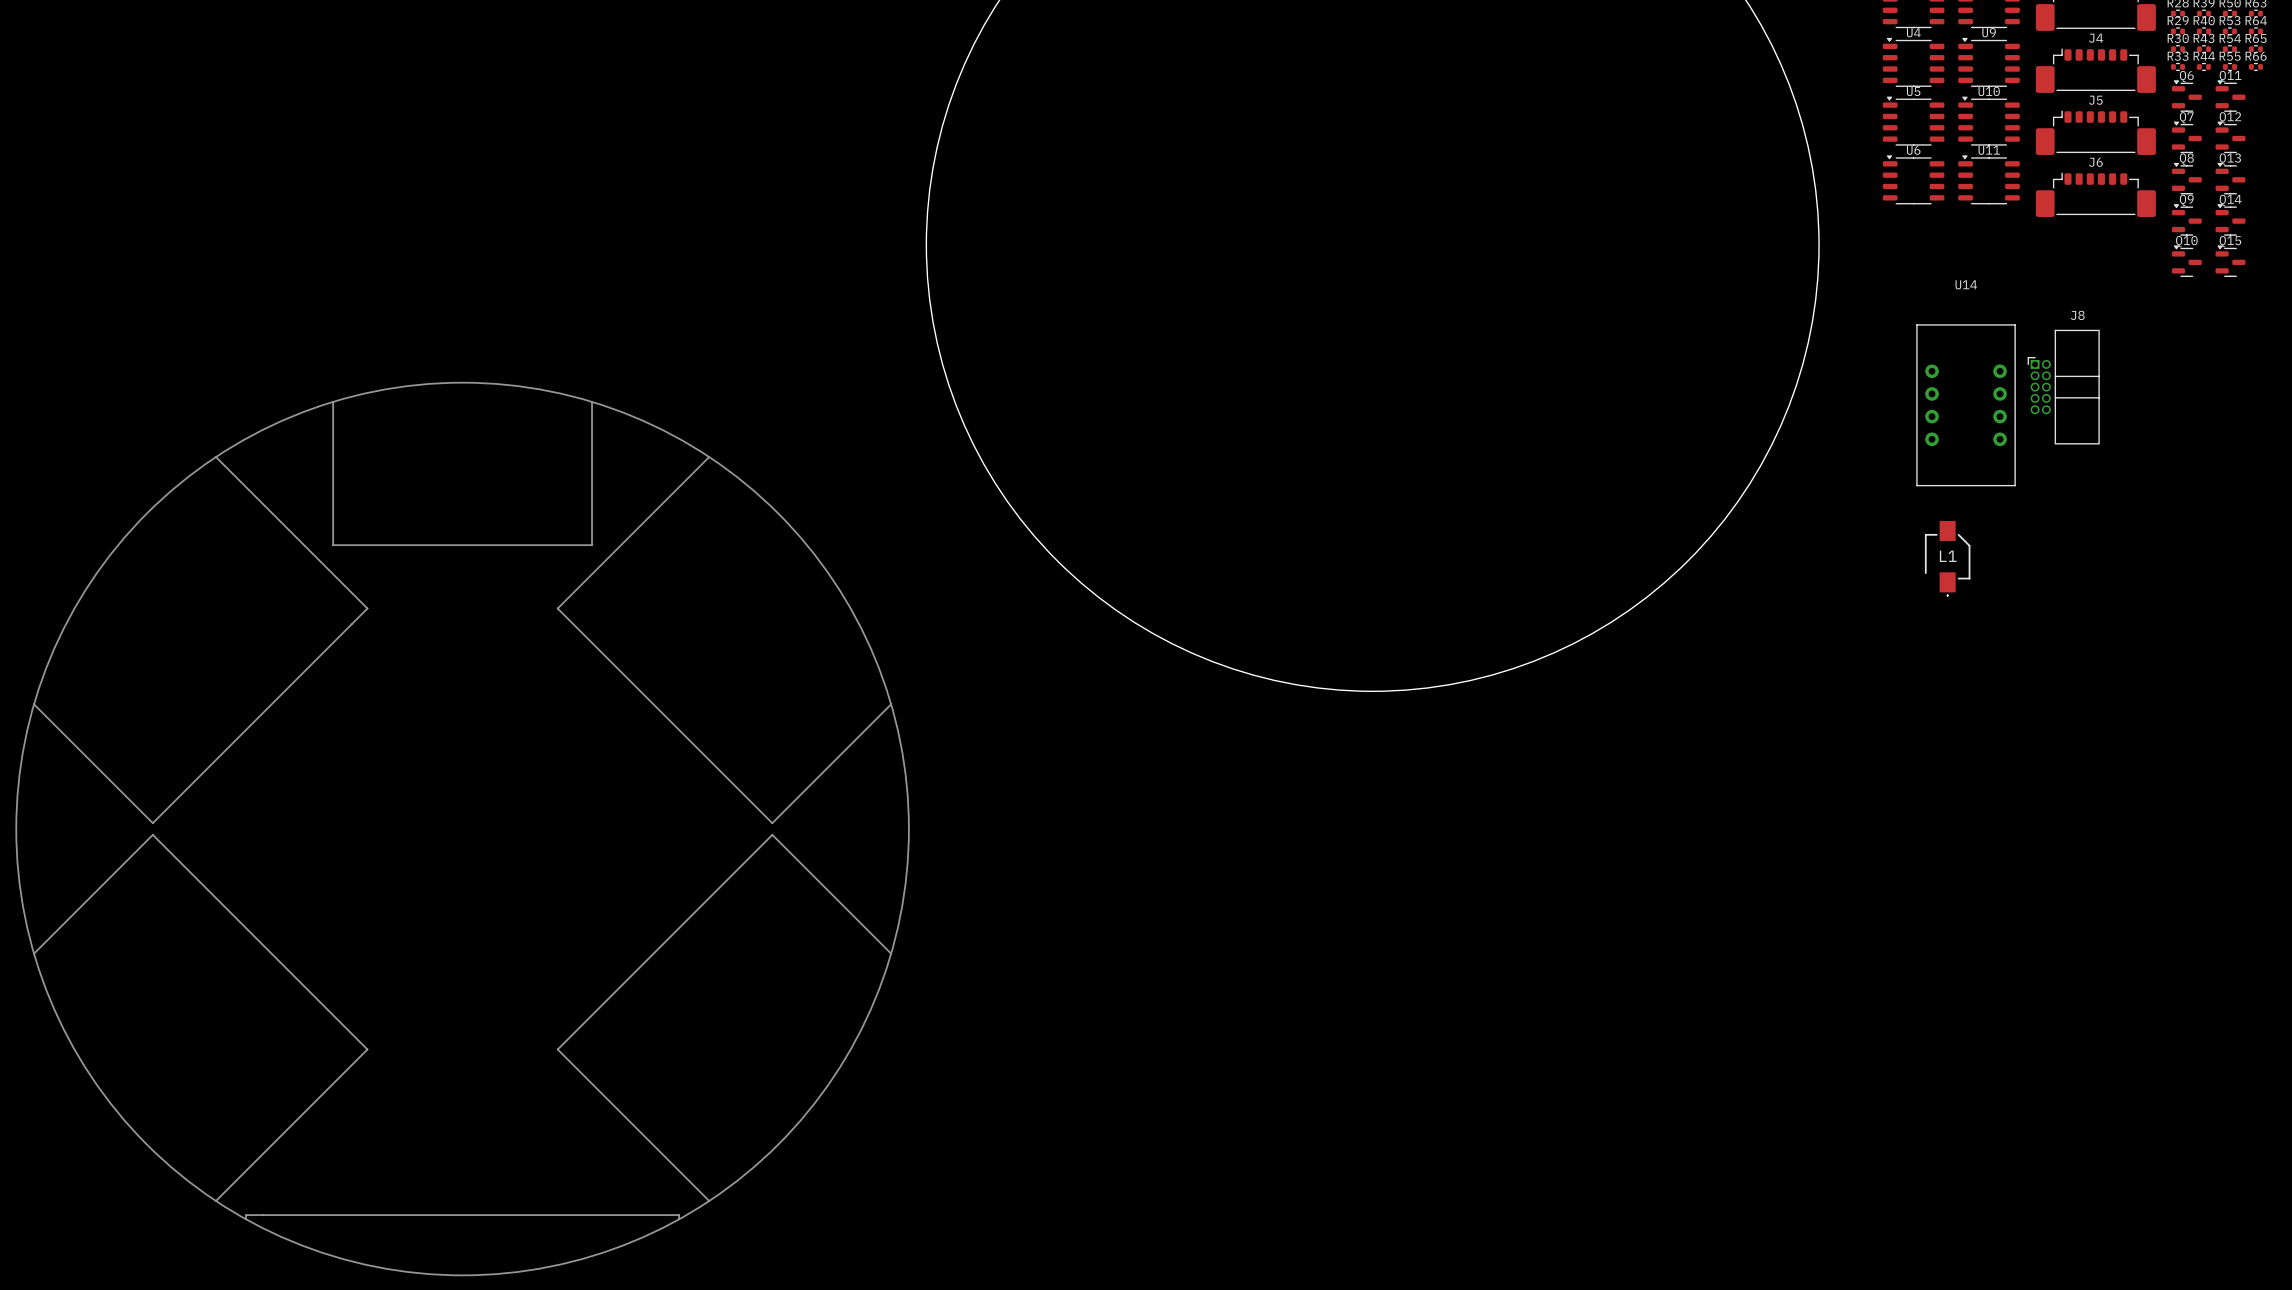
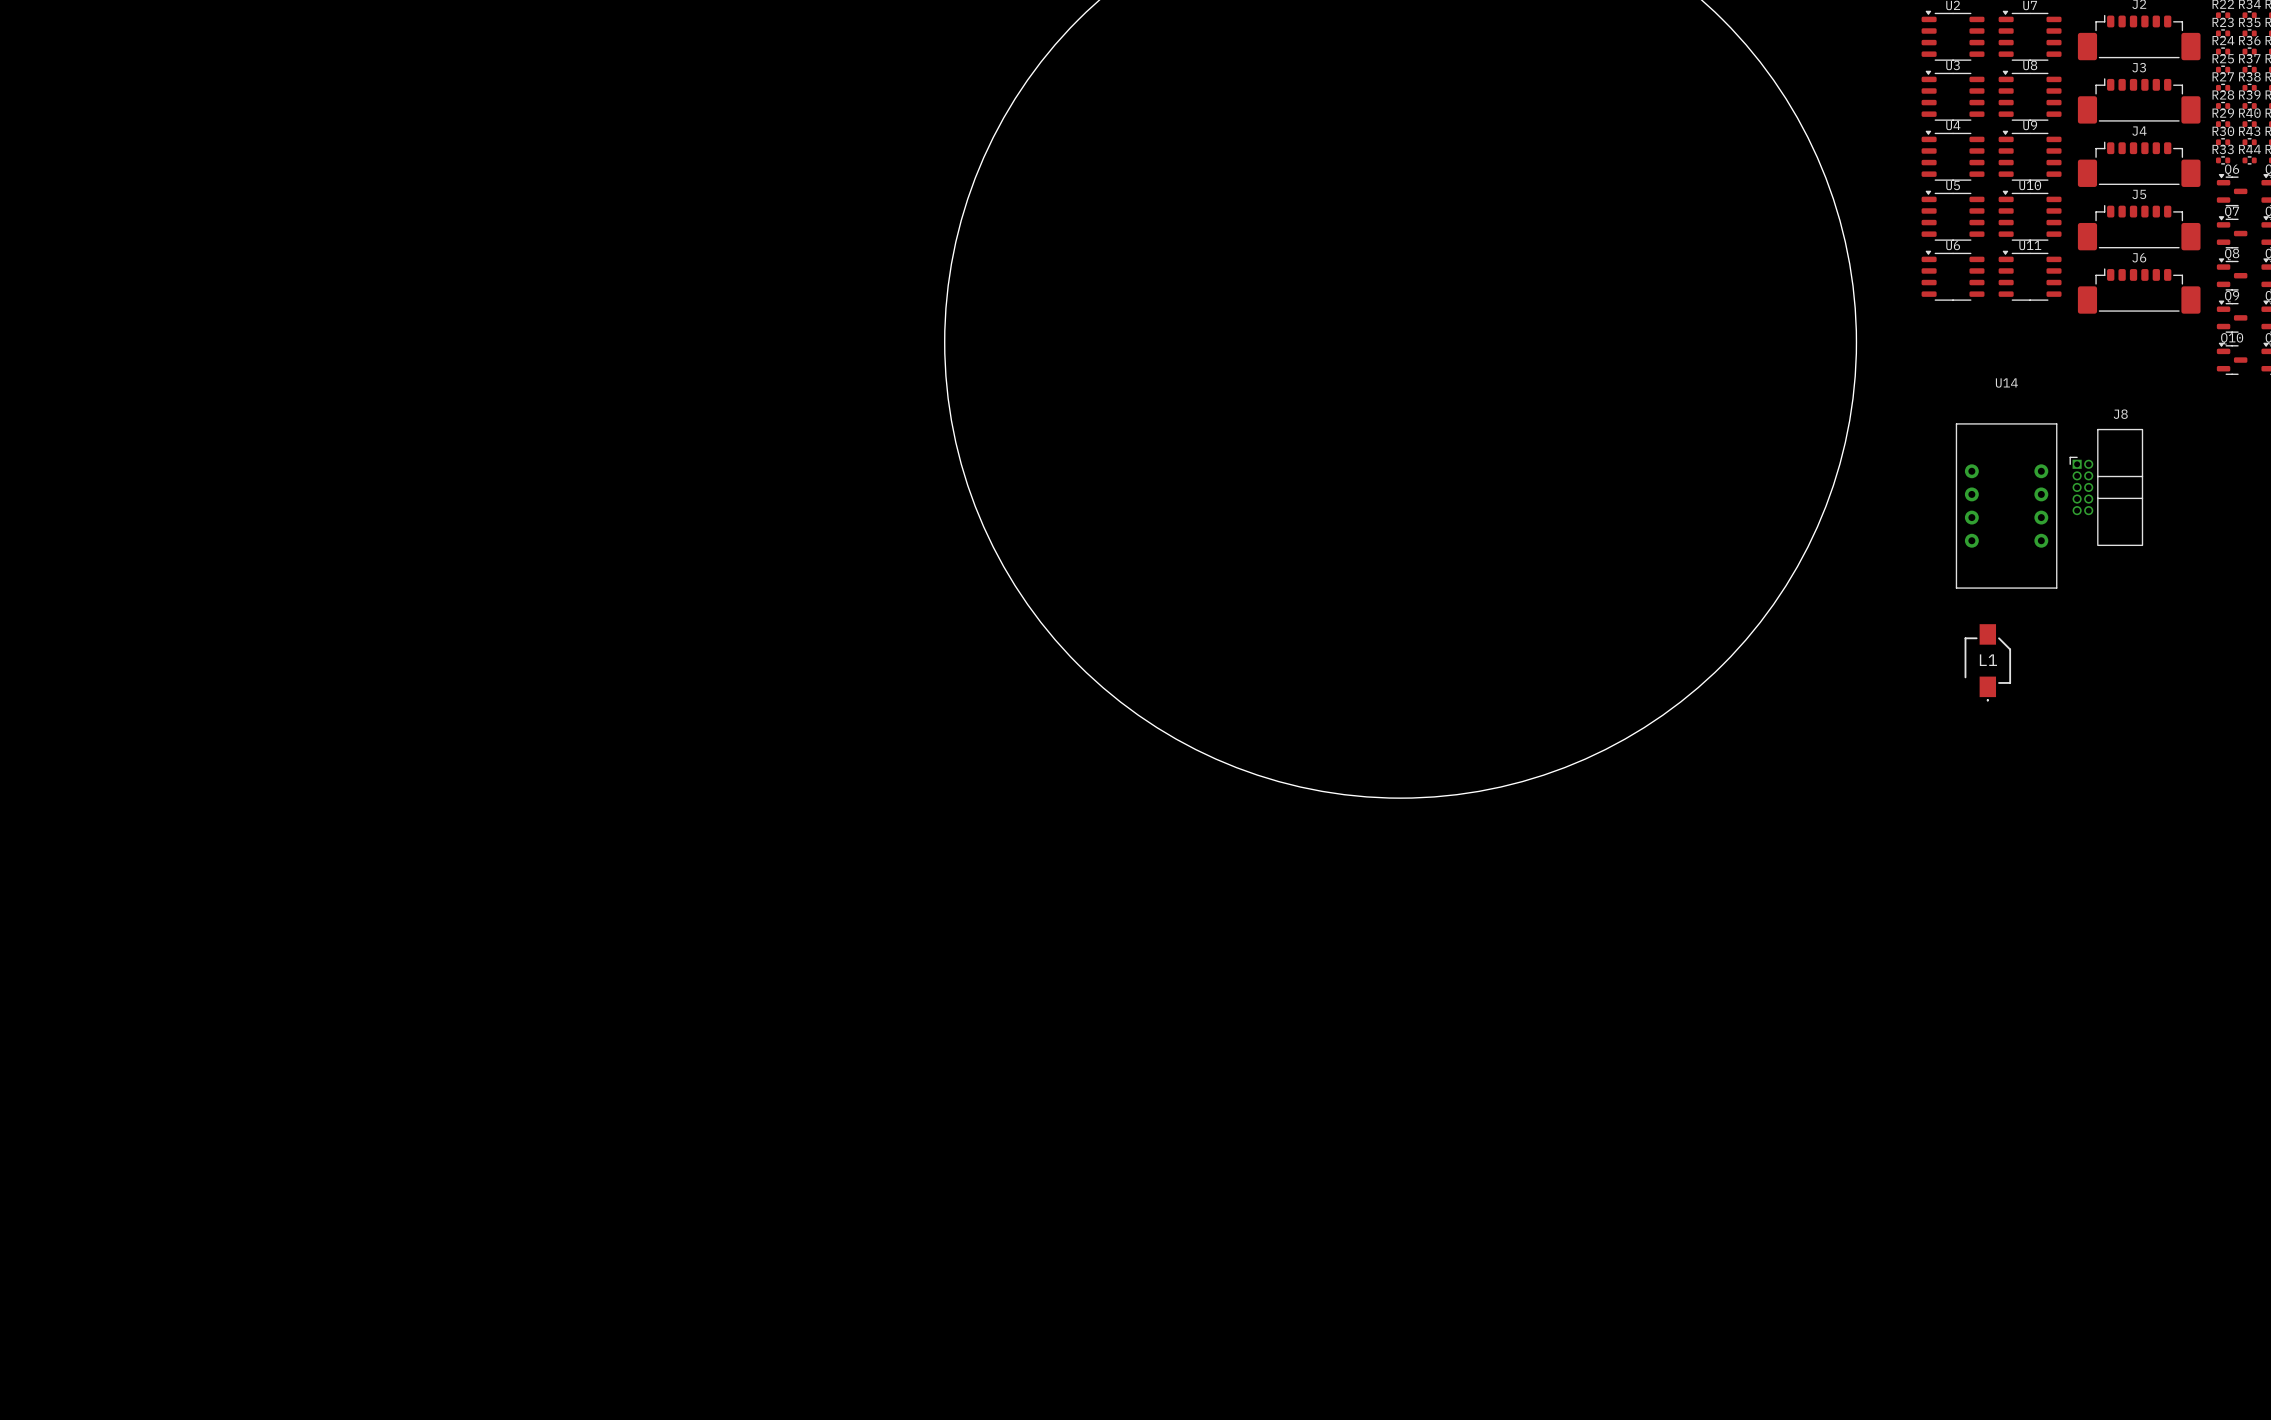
drawing: [15, 381, 910, 1277] -> none
line: (333, 401) (333, 545) (592, 545) (592, 401) -> none
line: (215, 457) (367, 608) (152, 823) (34, 704) -> none
line: (709, 457) (557, 608) (772, 823) (891, 704) -> none
line: (34, 953) (152, 834) (367, 1049) (215, 1201) -> none
line: (891, 953) (772, 834) (557, 1049) (709, 1201) -> none
line: (246, 1219) (246, 1215) (679, 1215) (679, 1219) -> none

